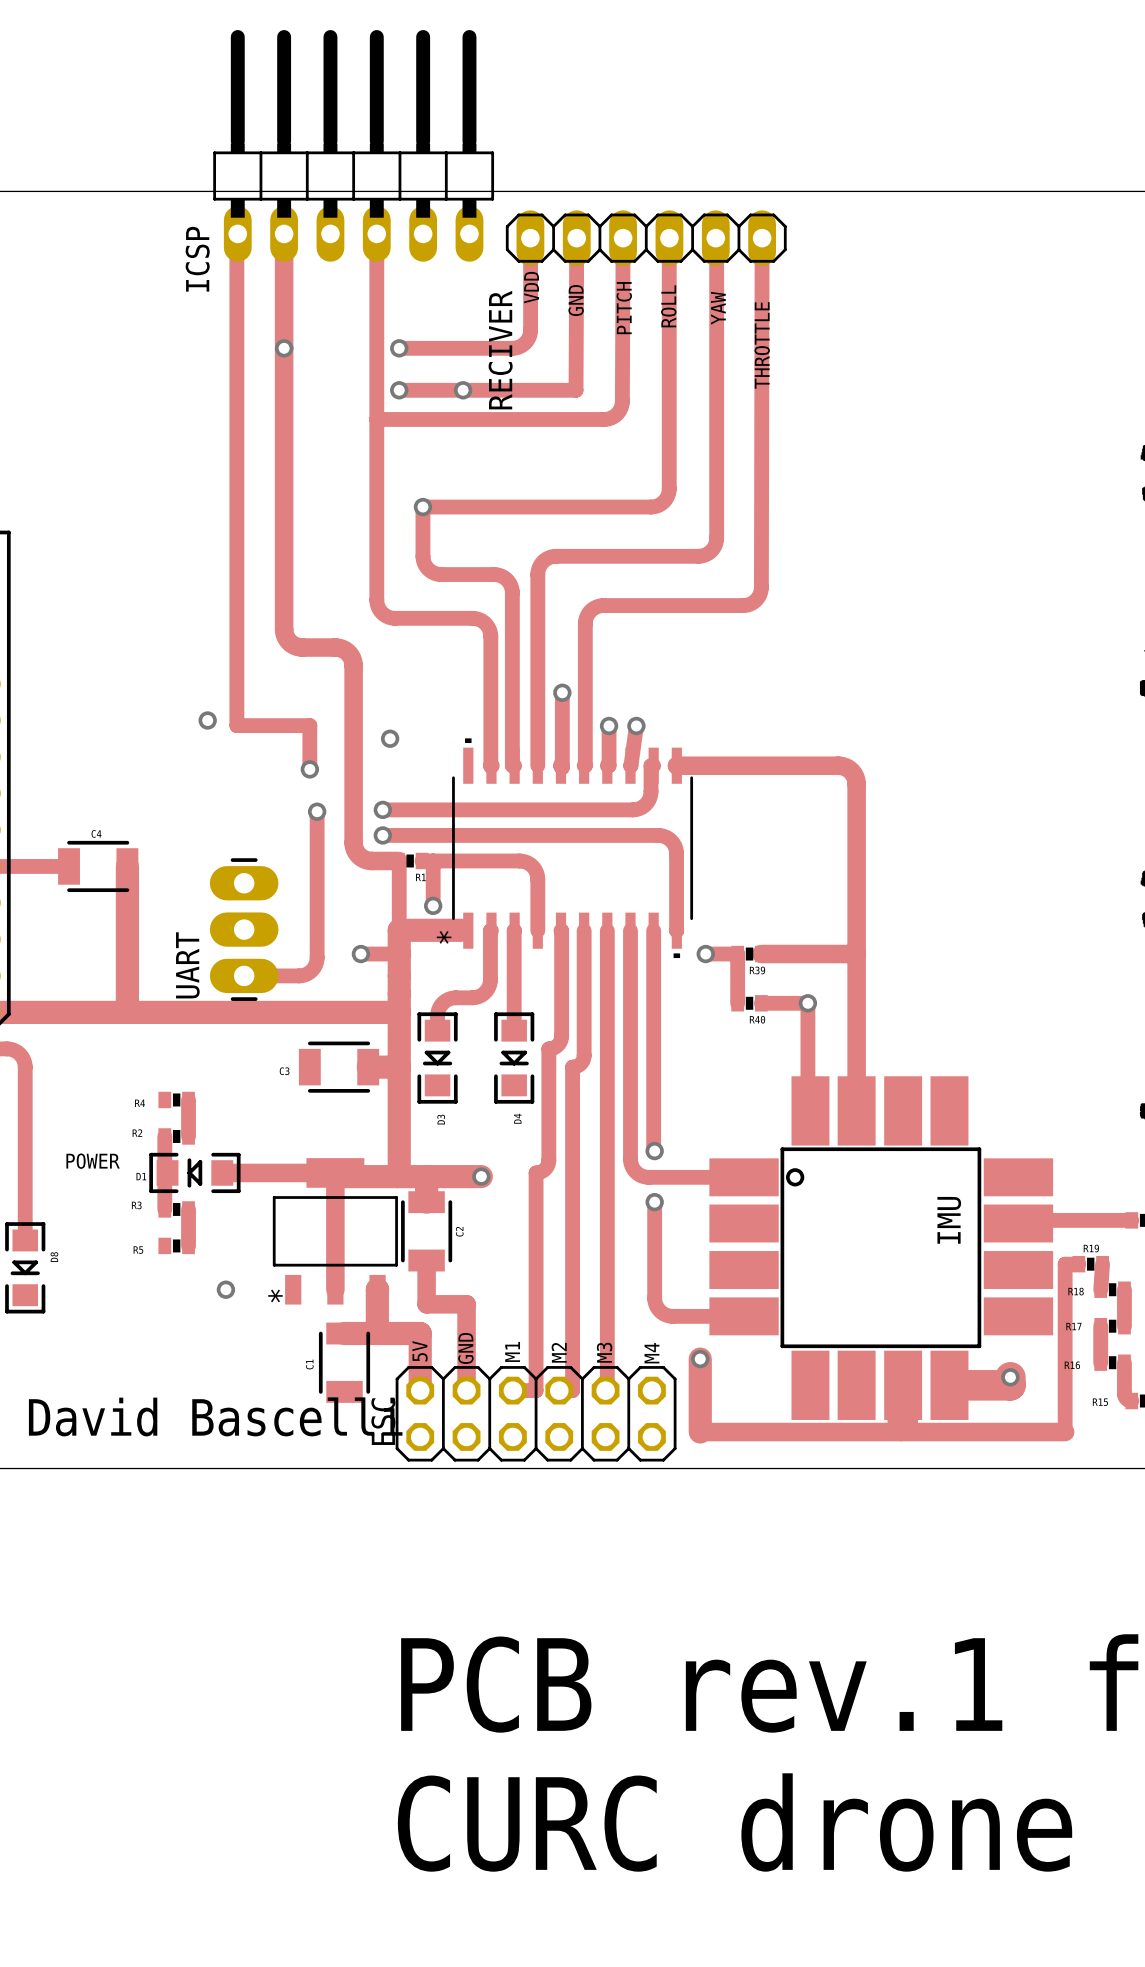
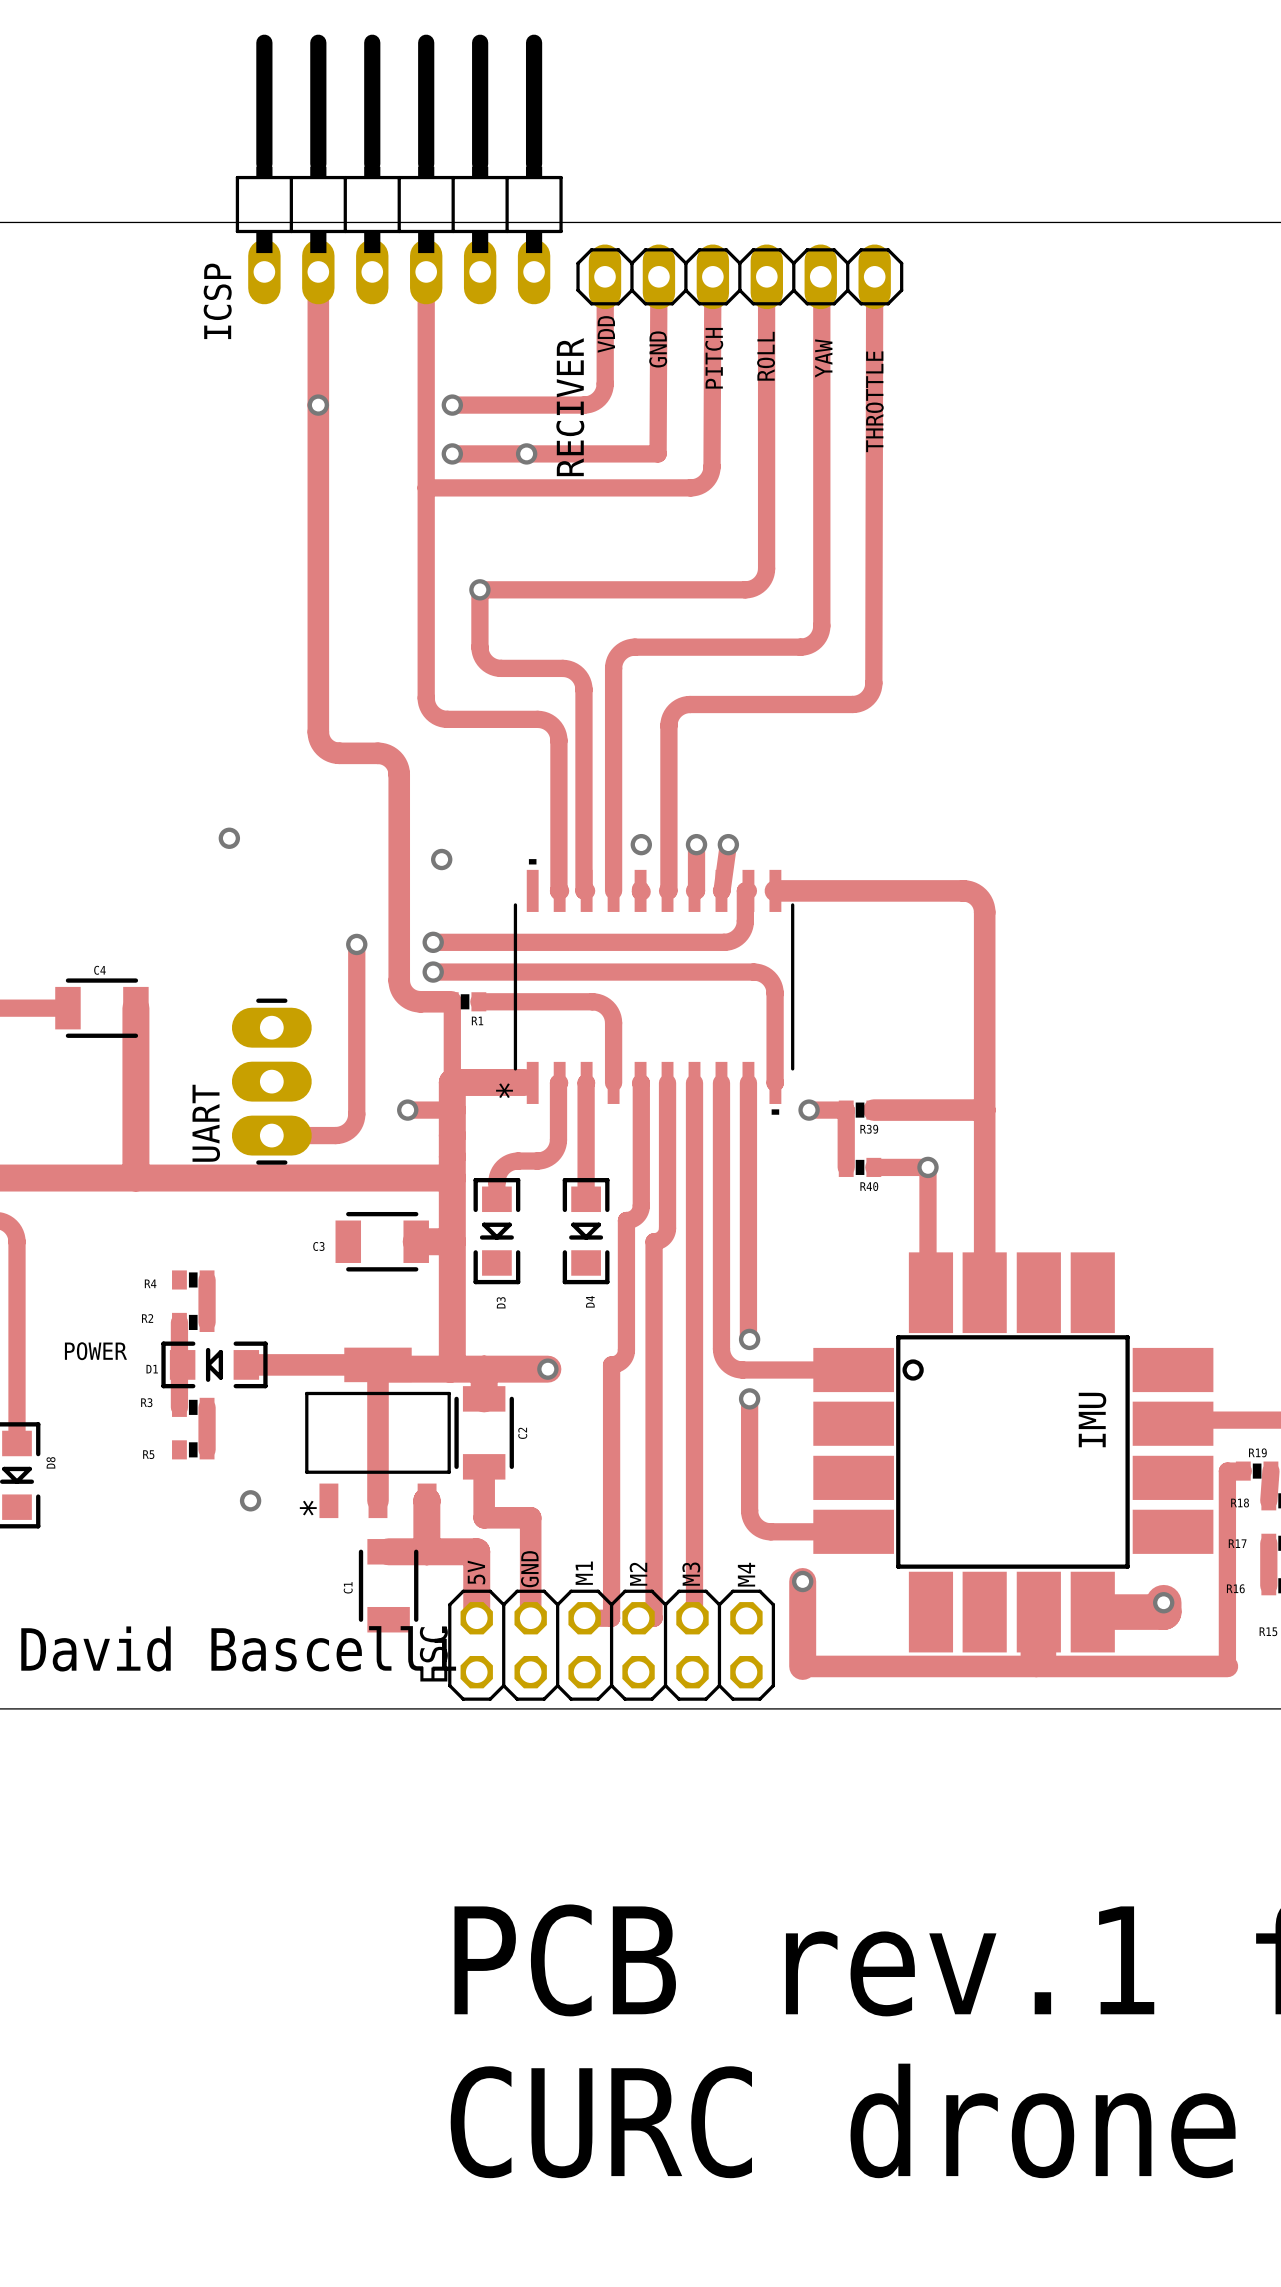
track: (237, 233) (236, 725) (309, 725) (309, 769) -> none
track: (562, 692) (562, 767) -> none
via position: (562, 692) -> (641, 844)
via: (309, 769) -> none
track: (433, 860) (433, 905) -> none
via: (433, 905) -> none

